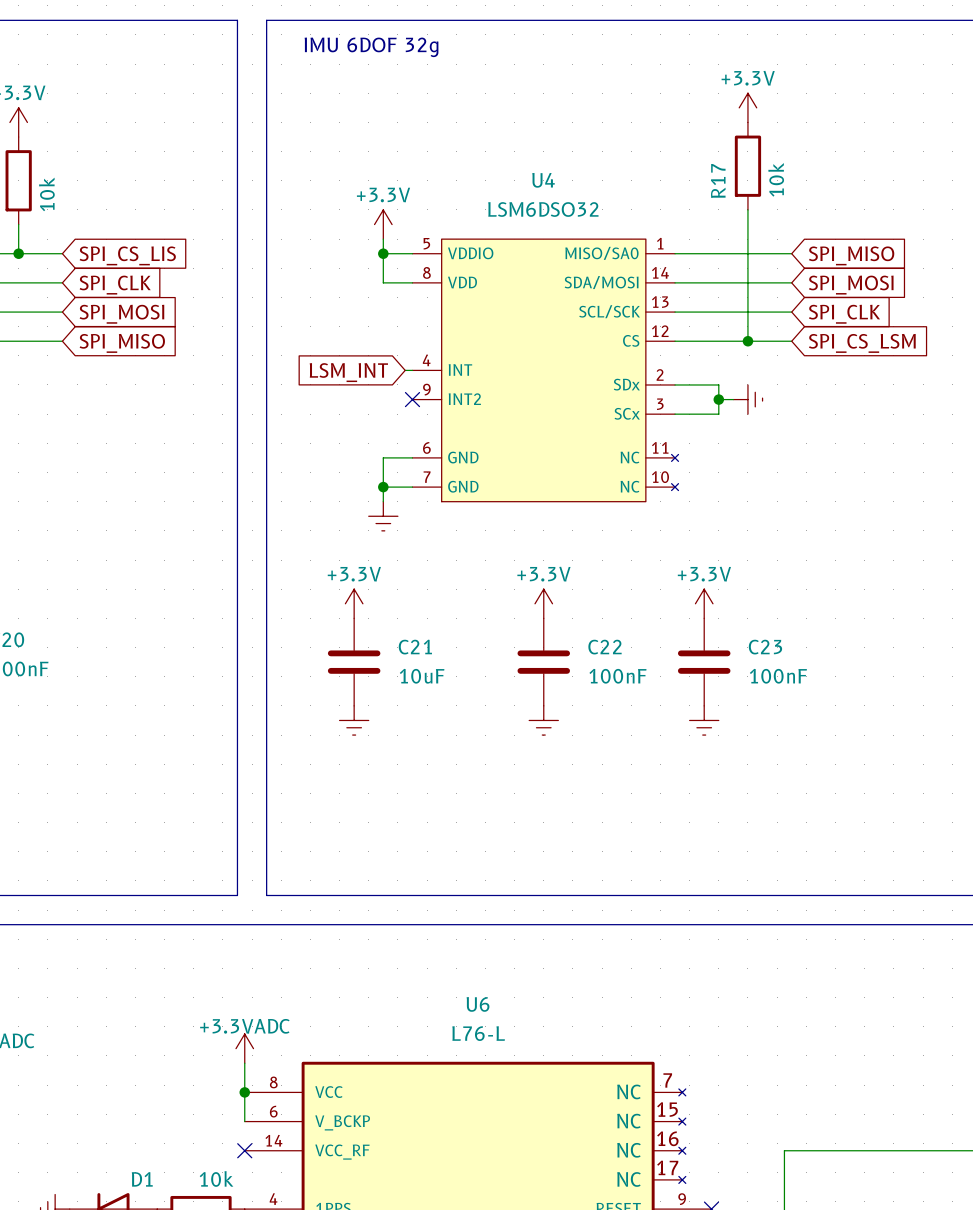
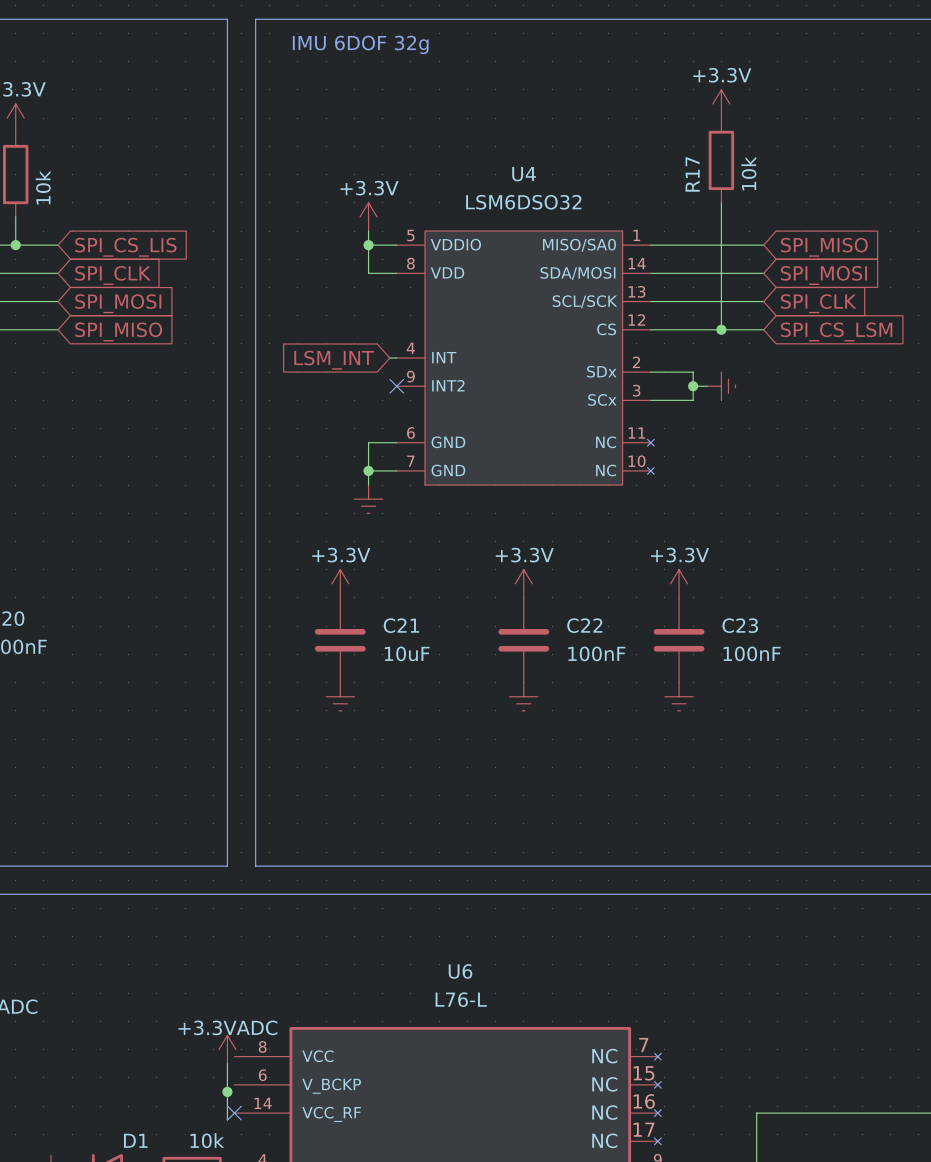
power symbol position: +3.3VADC (244, 1048) -> +3.3VADC (227, 1049)
wire: (244, 1063) (244, 1121) -> (227, 1063) (227, 1120)
junction position: (244, 1092) -> (227, 1091)

